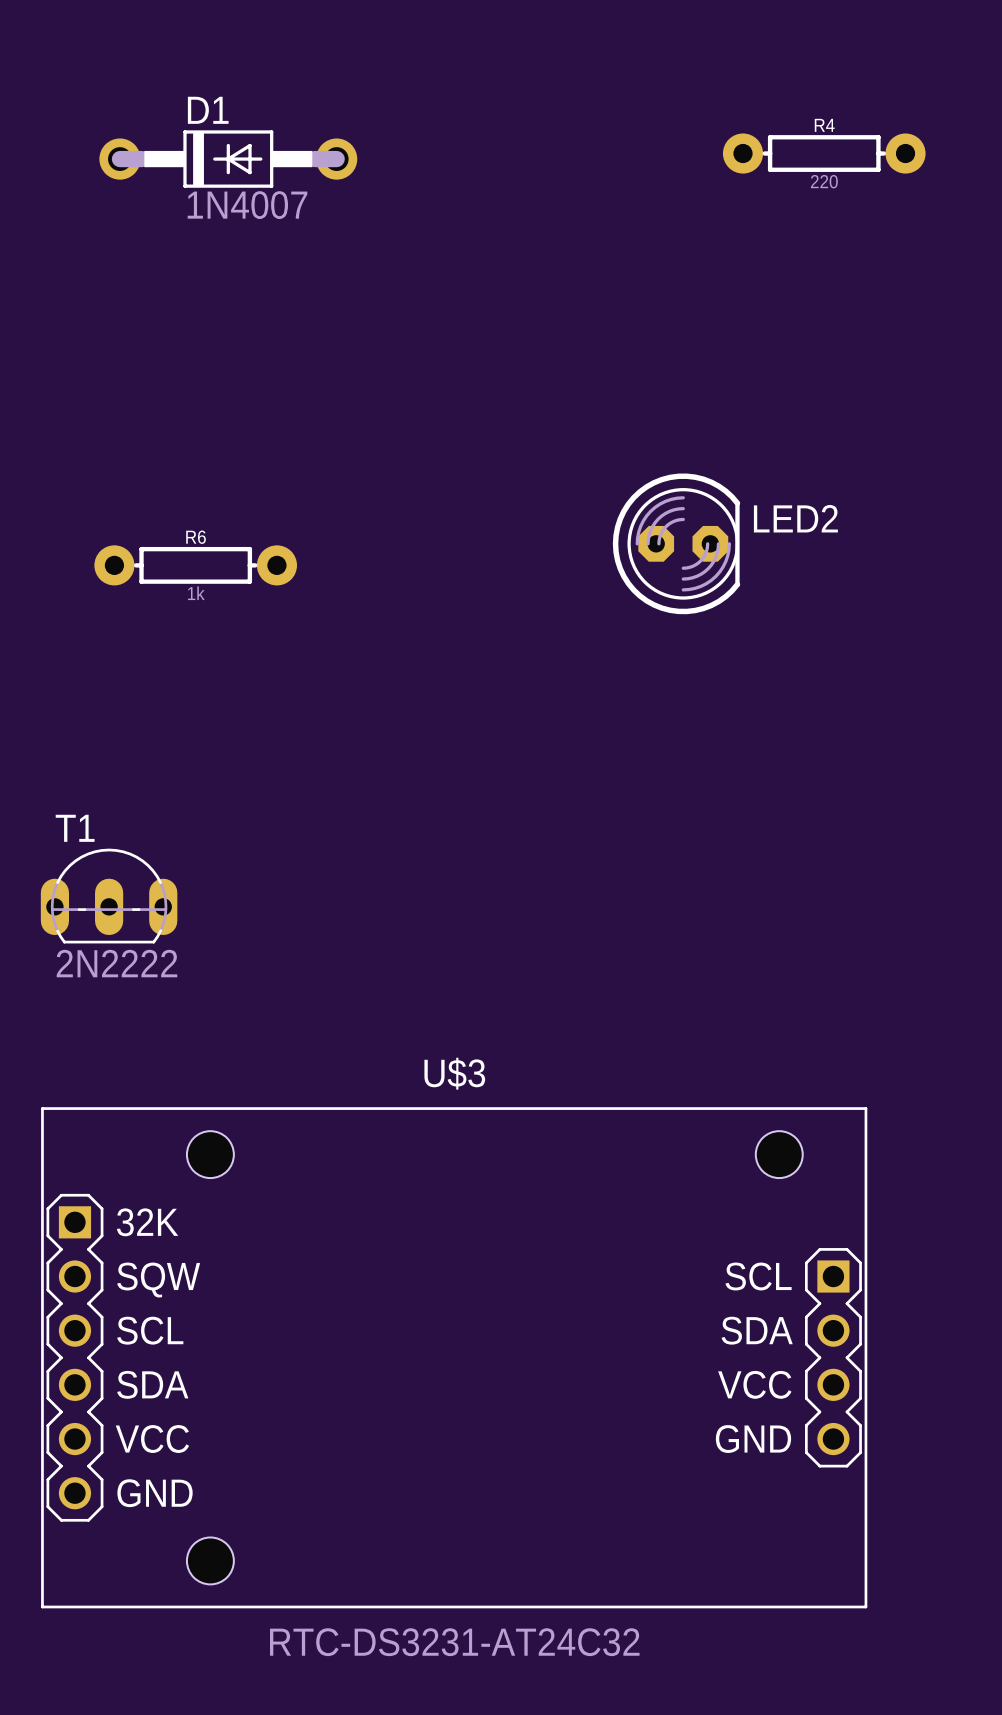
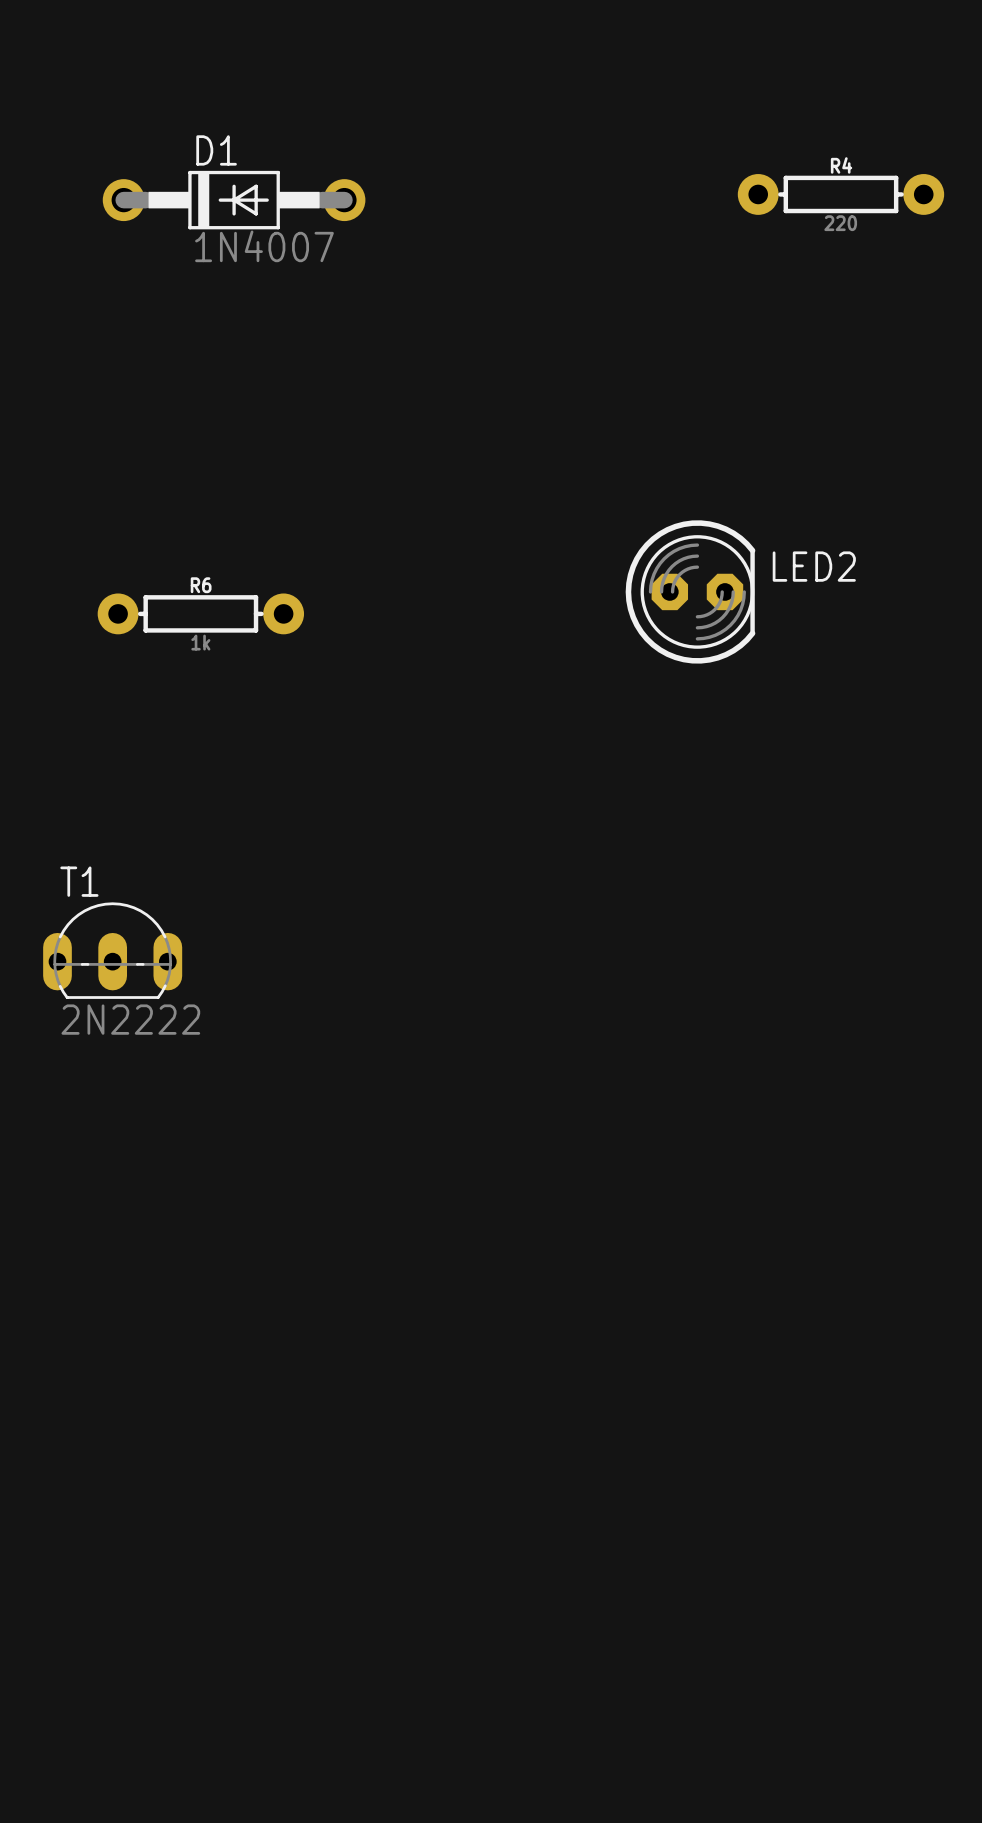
U$3: RTC-DS3231-AT24C32 (454, 1357) -> none

